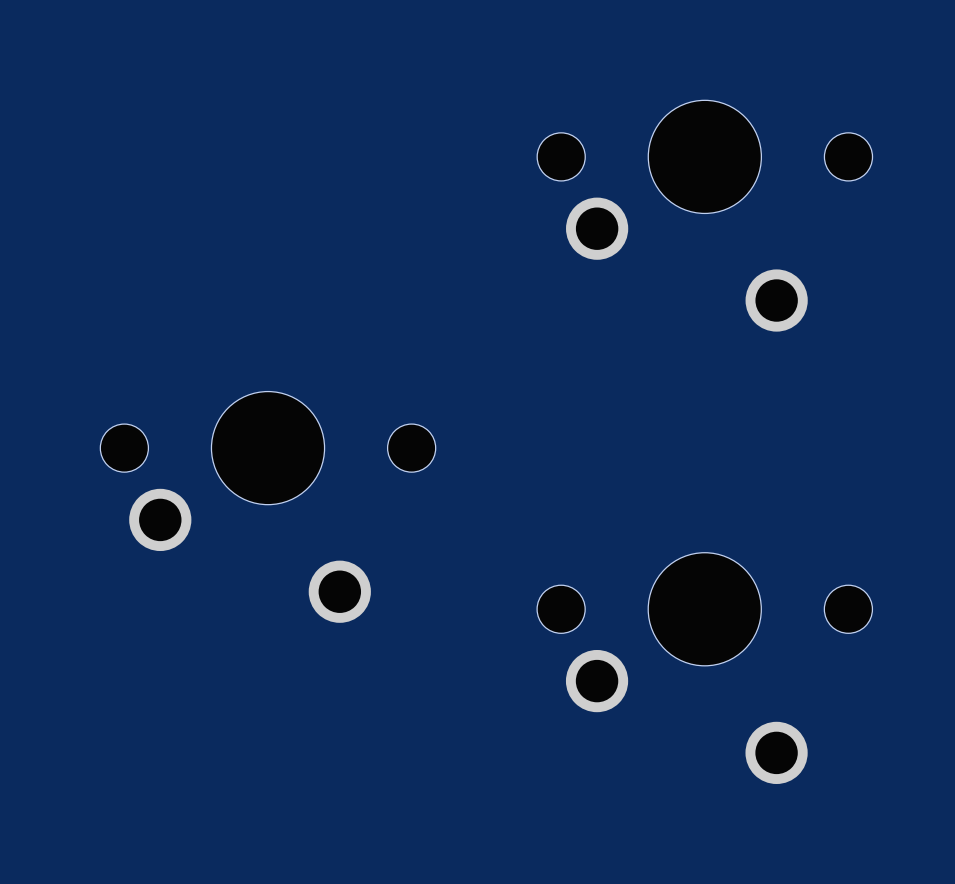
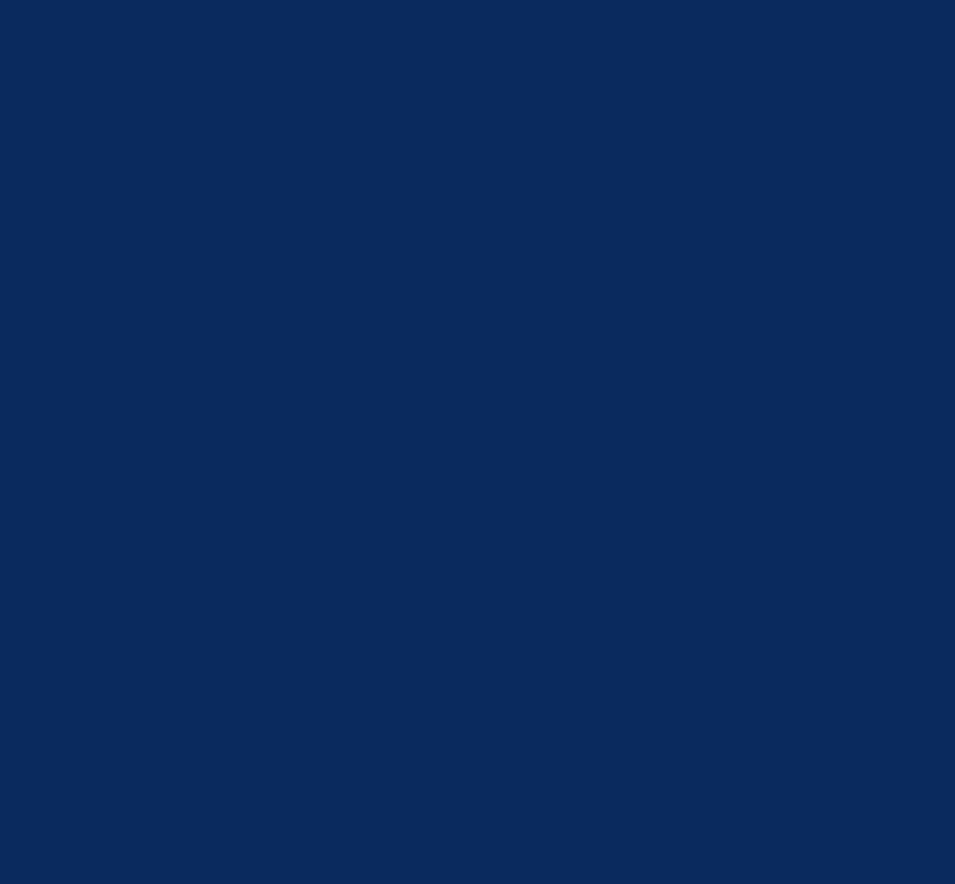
part: (704, 215) -> none
part: (268, 507) -> none
part: (704, 668) -> none

